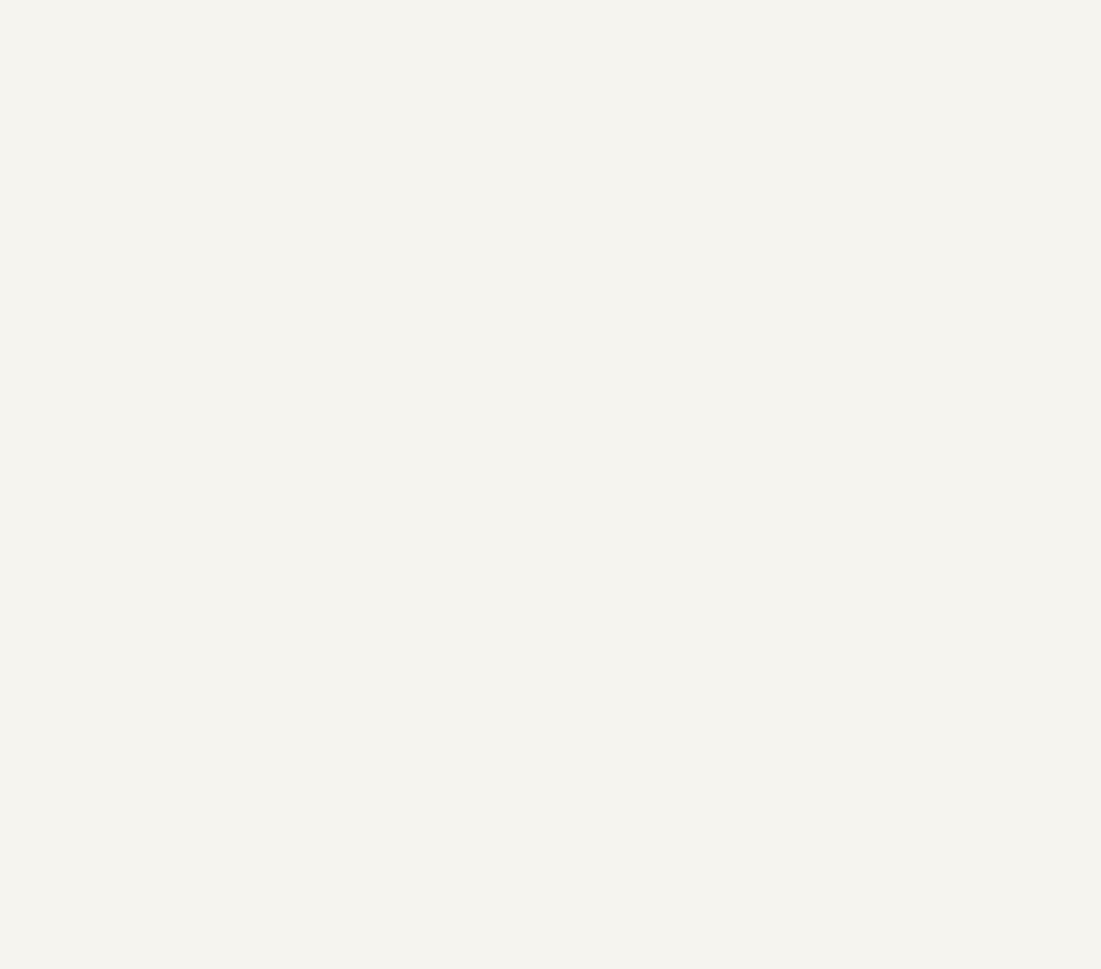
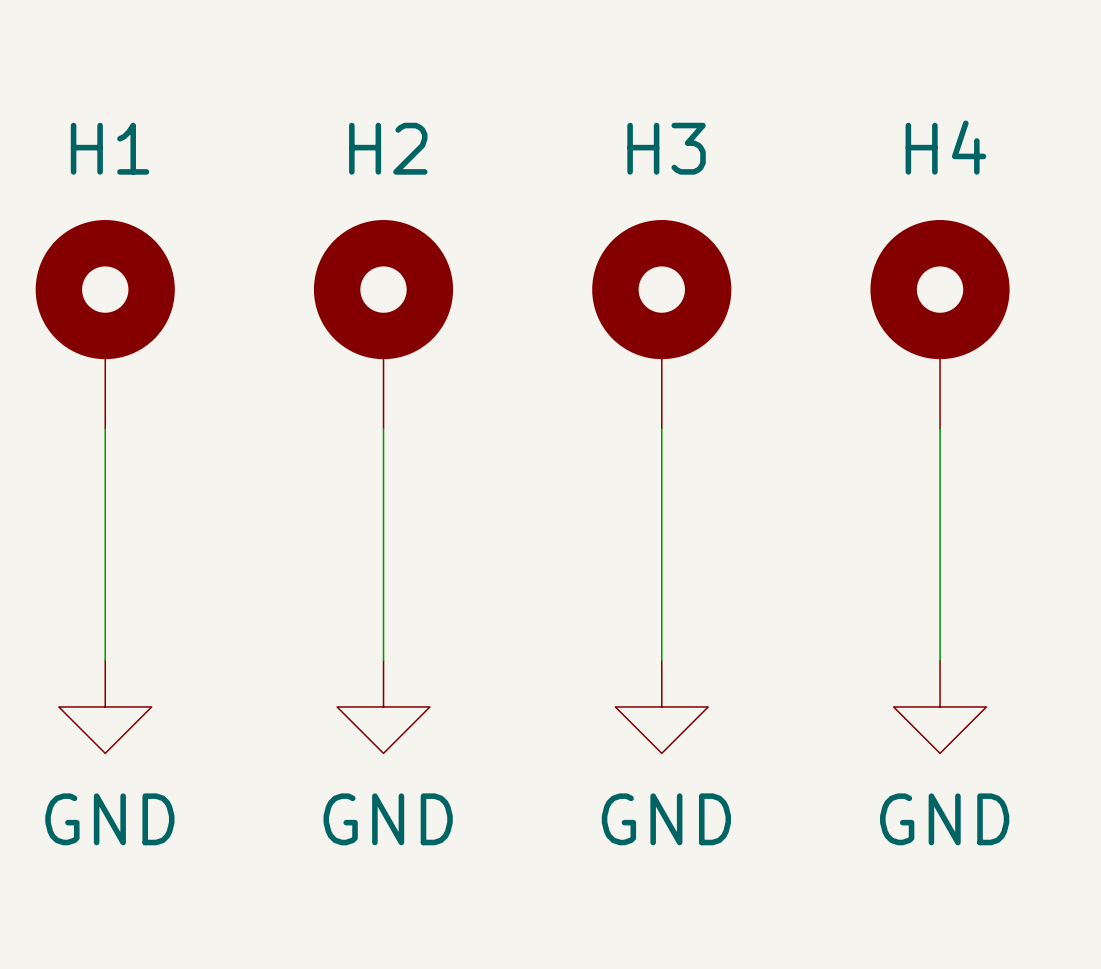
H1: none -> (105, 324)
H2: none -> (383, 324)
H3: none -> (661, 324)
H4: none -> (940, 324)
wire: none -> (105, 428) (105, 660)
wire: none -> (383, 428) (383, 660)
wire: none -> (661, 428) (661, 660)
wire: none -> (940, 428) (940, 660)
power symbol: none -> GND (105, 706)
power symbol: none -> GND (383, 706)
power symbol: none -> GND (661, 706)
power symbol: none -> GND (940, 706)

